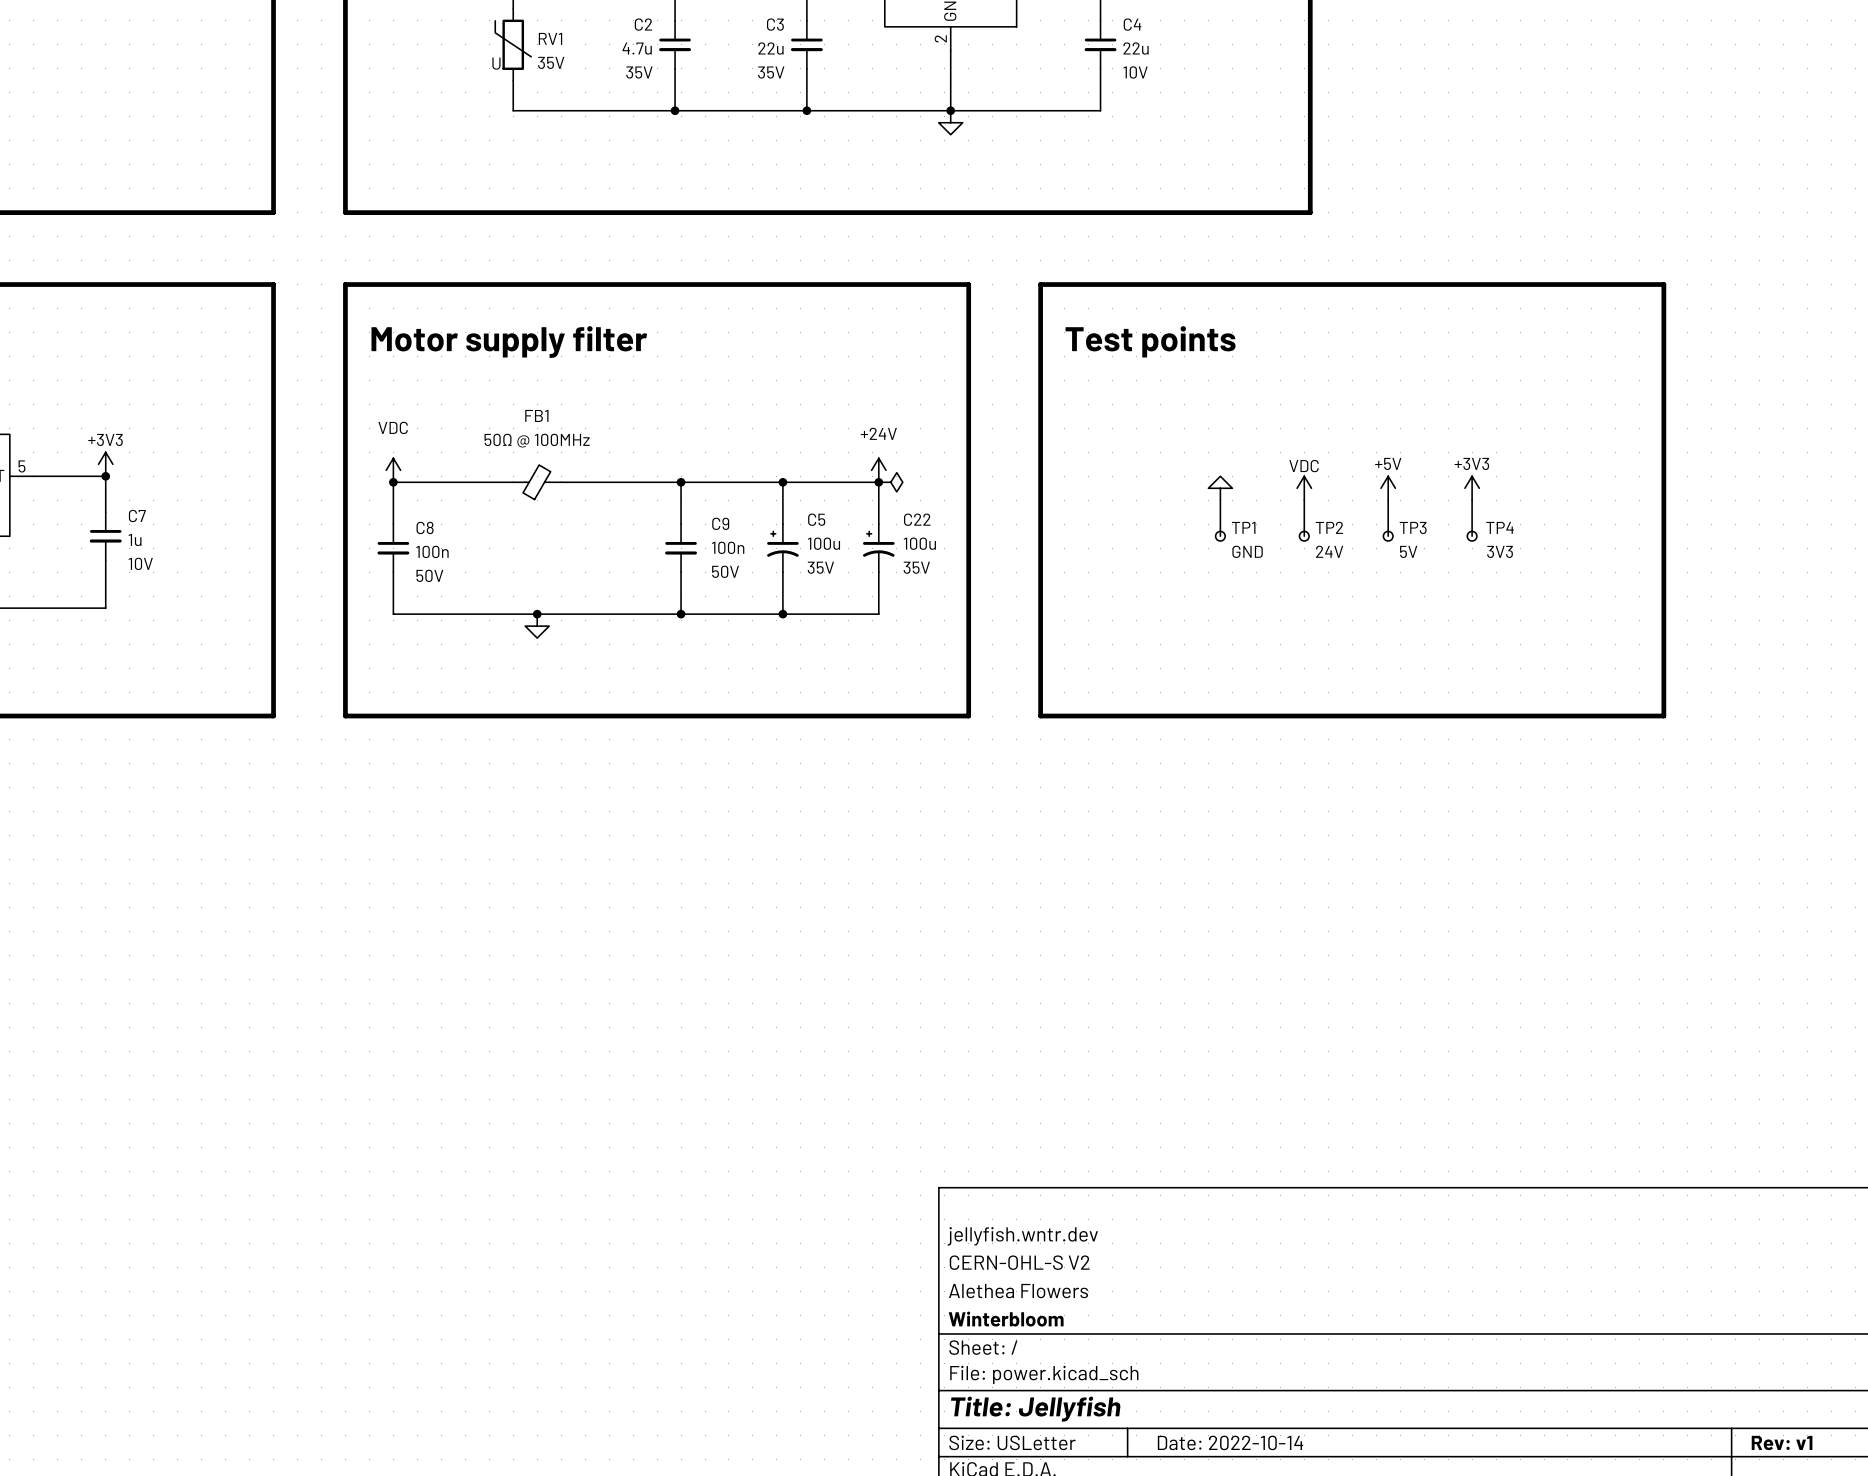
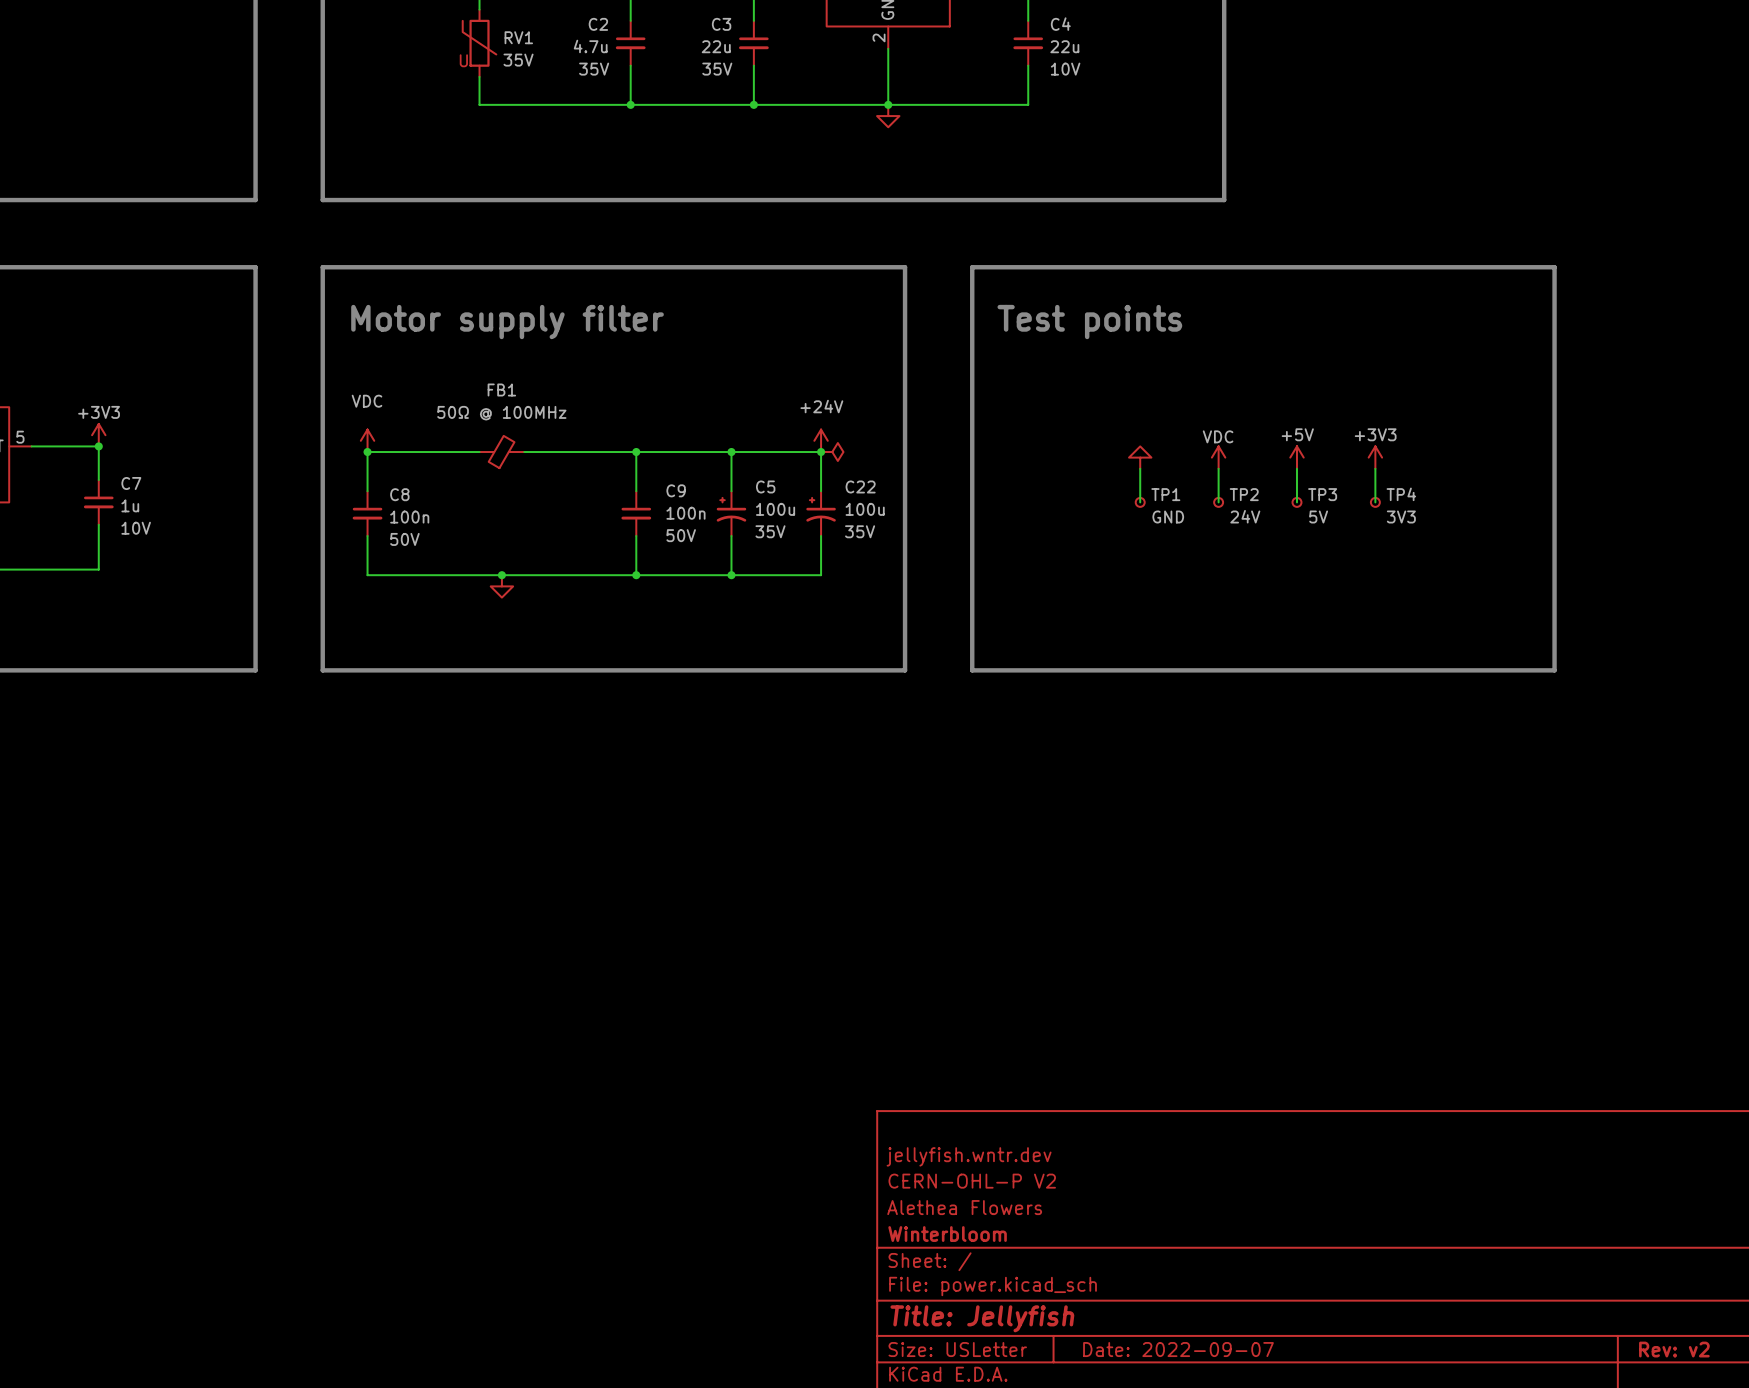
title block: CERN-OHL-S V2 (1019, 1262) -> CERN-OHL-P V2 (972, 1181)
title block: Date: 2022-10-14 (1230, 1442) -> Date: 2022-09-07 (1178, 1349)
title block: Rev: v1 (1782, 1443) -> Rev: v2 (1674, 1349)

